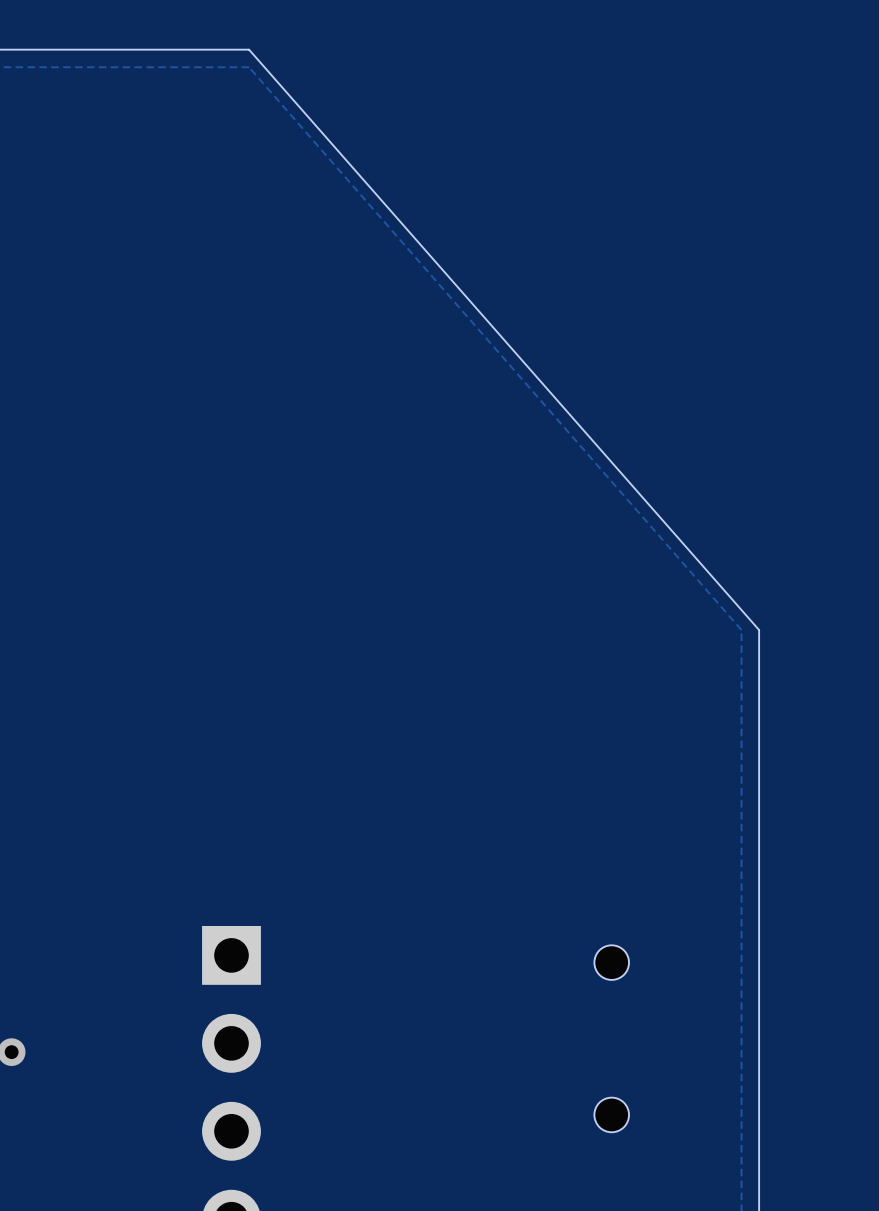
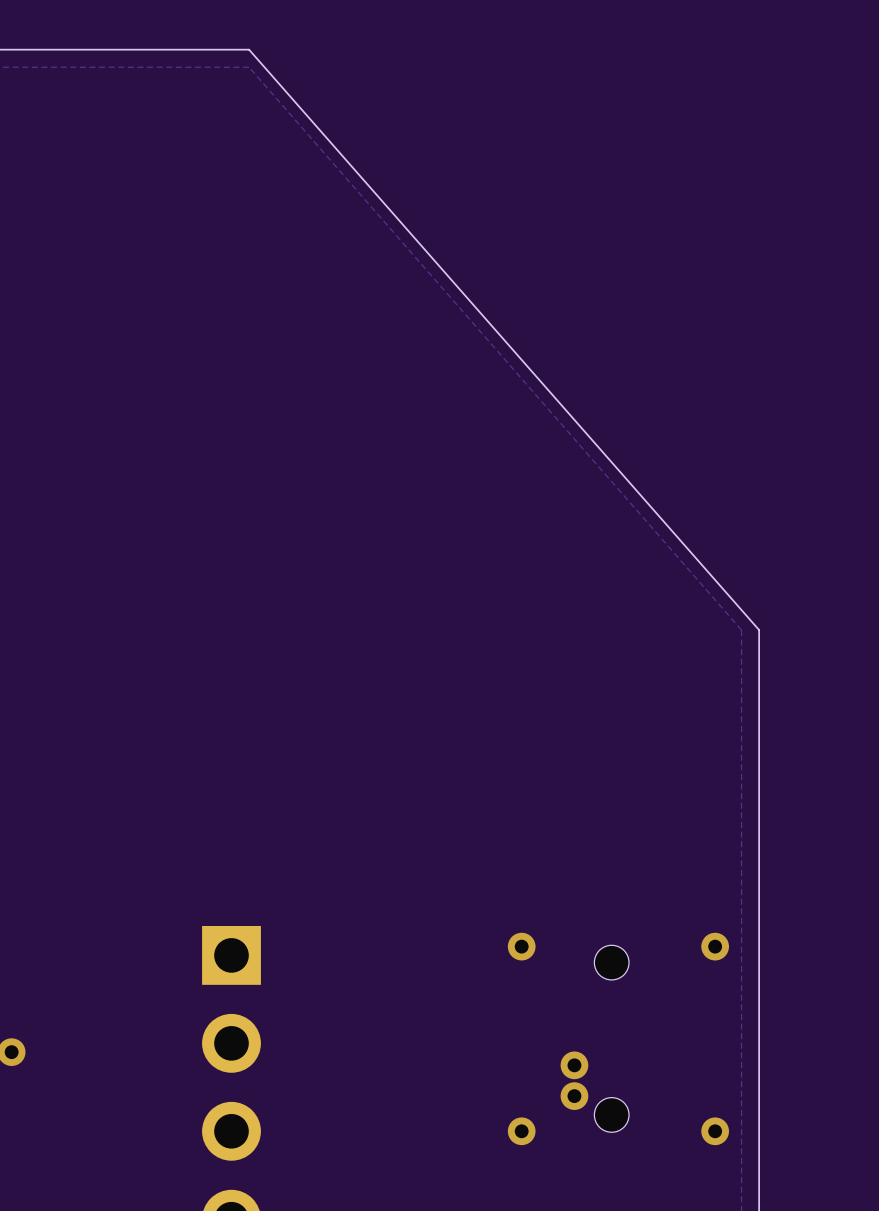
via: none -> (521, 946)
via: none -> (715, 946)
via: none -> (574, 1065)
via: none -> (574, 1096)
via: none -> (521, 1131)
via: none -> (715, 1131)

